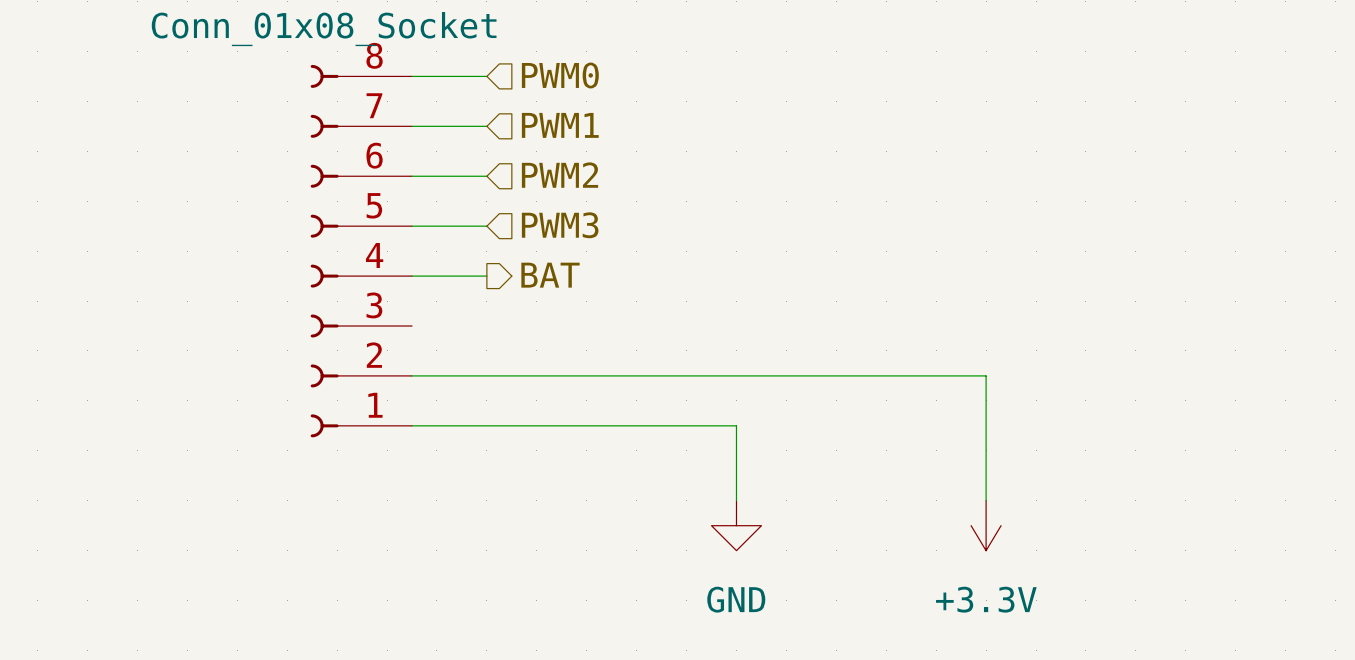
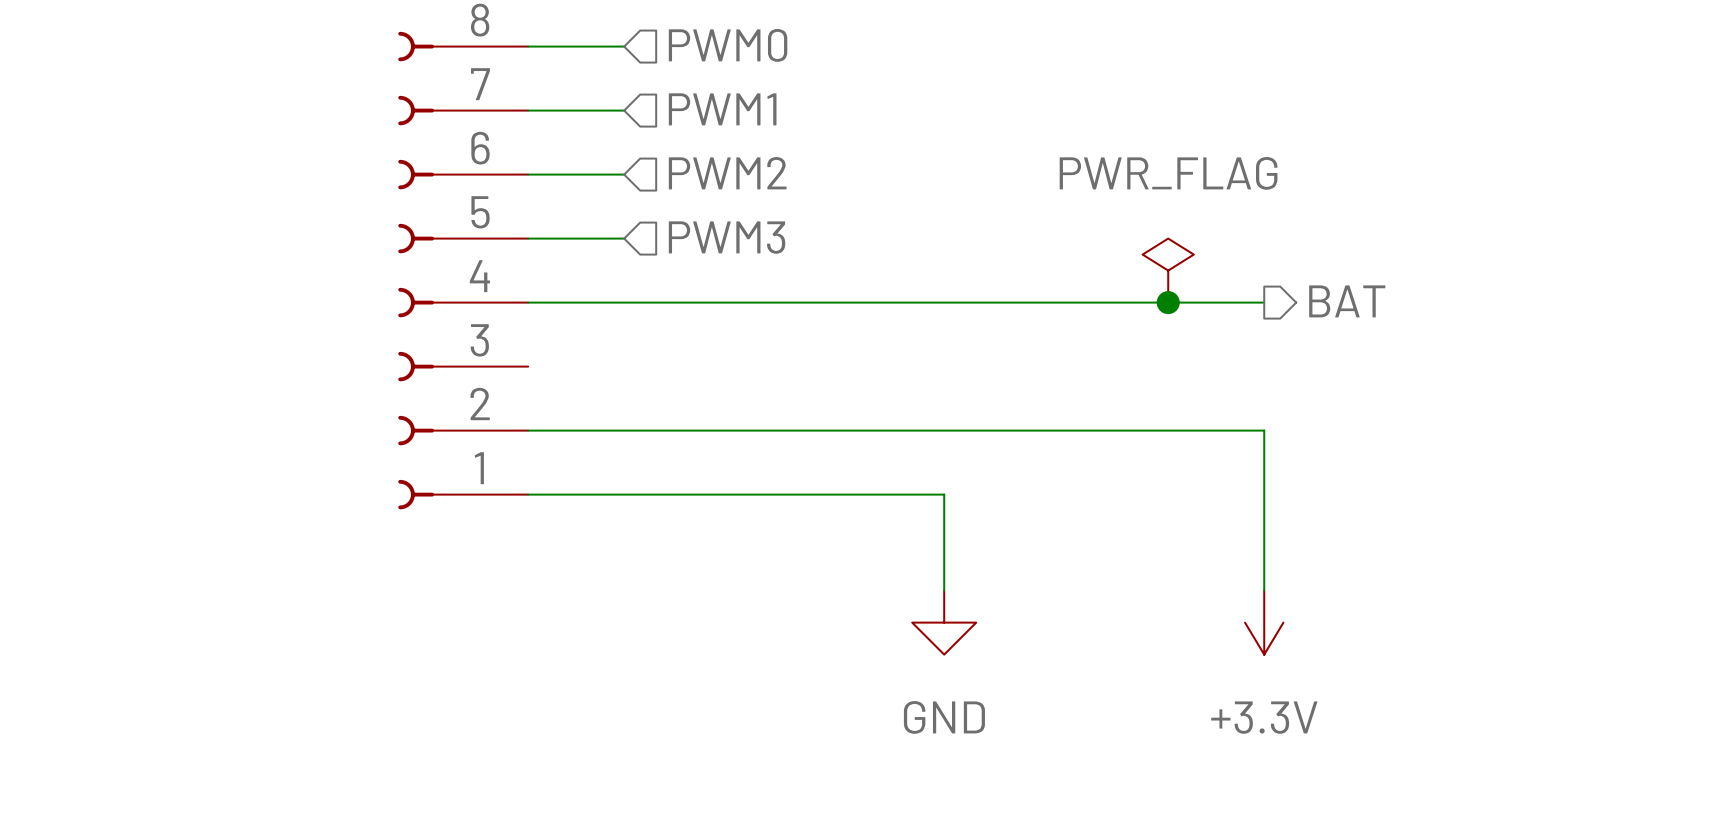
power symbol: none -> PWR_FLAG (1168, 270)
hierarchical label: BAT (550, 275) -> none
hierarchical label: none -> BAT (1347, 301)
wire: none -> (624, 302) (1264, 302)
junction: none -> (1168, 302)

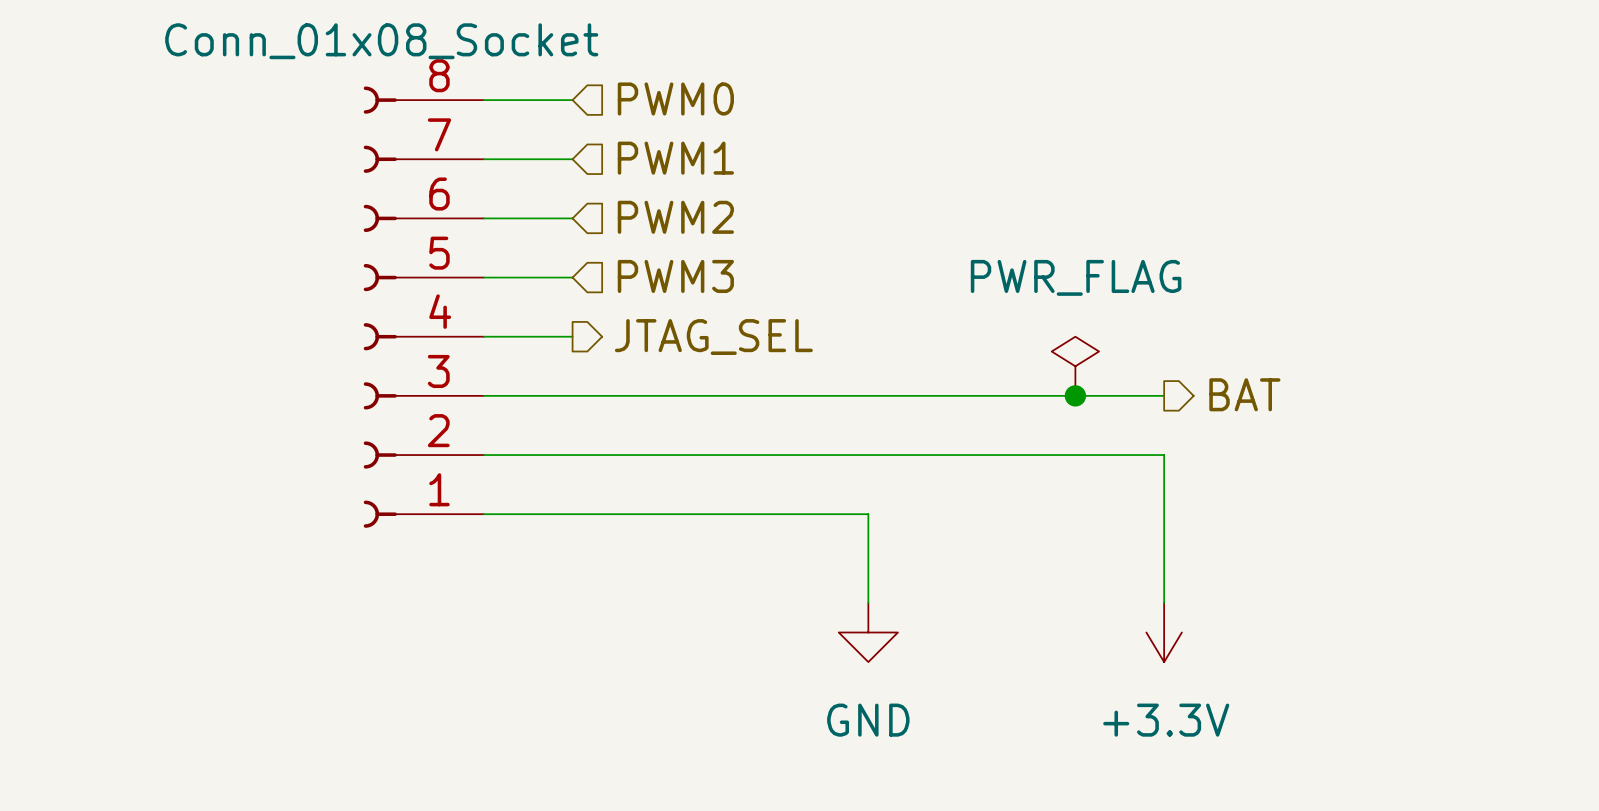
power symbol position: PWR_FLAG (1168, 270) -> PWR_FLAG (1075, 366)
hierarchical label: none -> JTAG_SEL (713, 337)
hierarchical label position: BAT (1347, 301) -> BAT (1244, 394)
wire: (624, 302) (1264, 302) -> none
junction position: (1168, 302) -> (1075, 395)
wire: none -> (483, 395) (1164, 395)

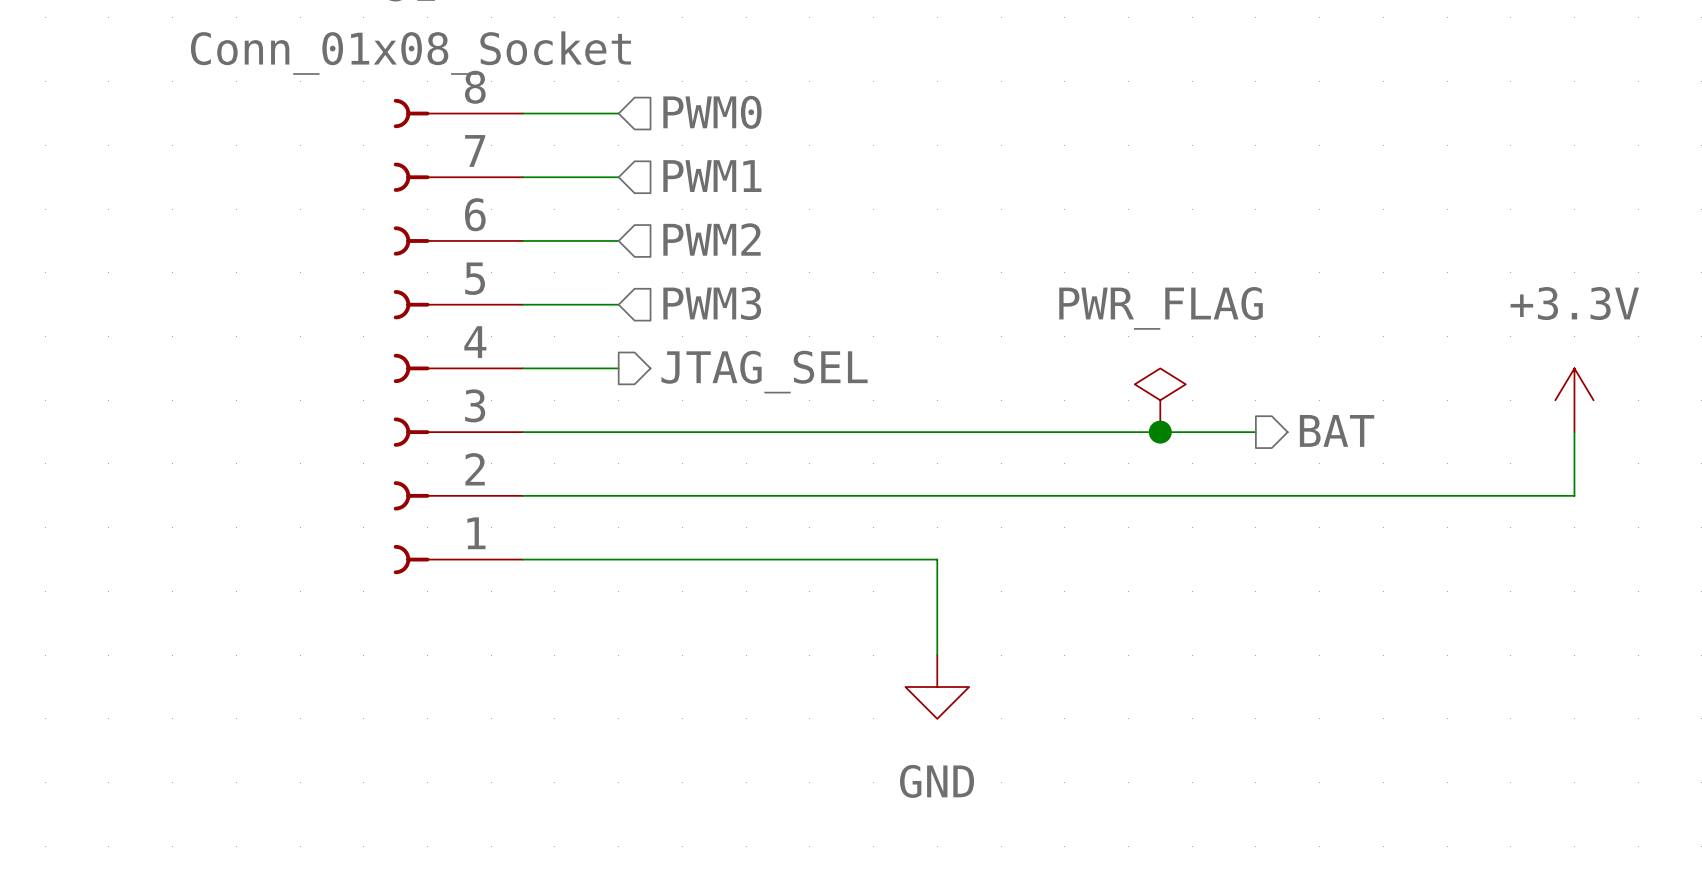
wire: (1164, 455) (1164, 602) -> (1255, 495) (1574, 495) (1574, 432)
power symbol rotation: 0° (1164, 632) -> 180° (1574, 400)
power symbol position: +3.3V (1164, 632) -> +3.3V (1574, 400)

